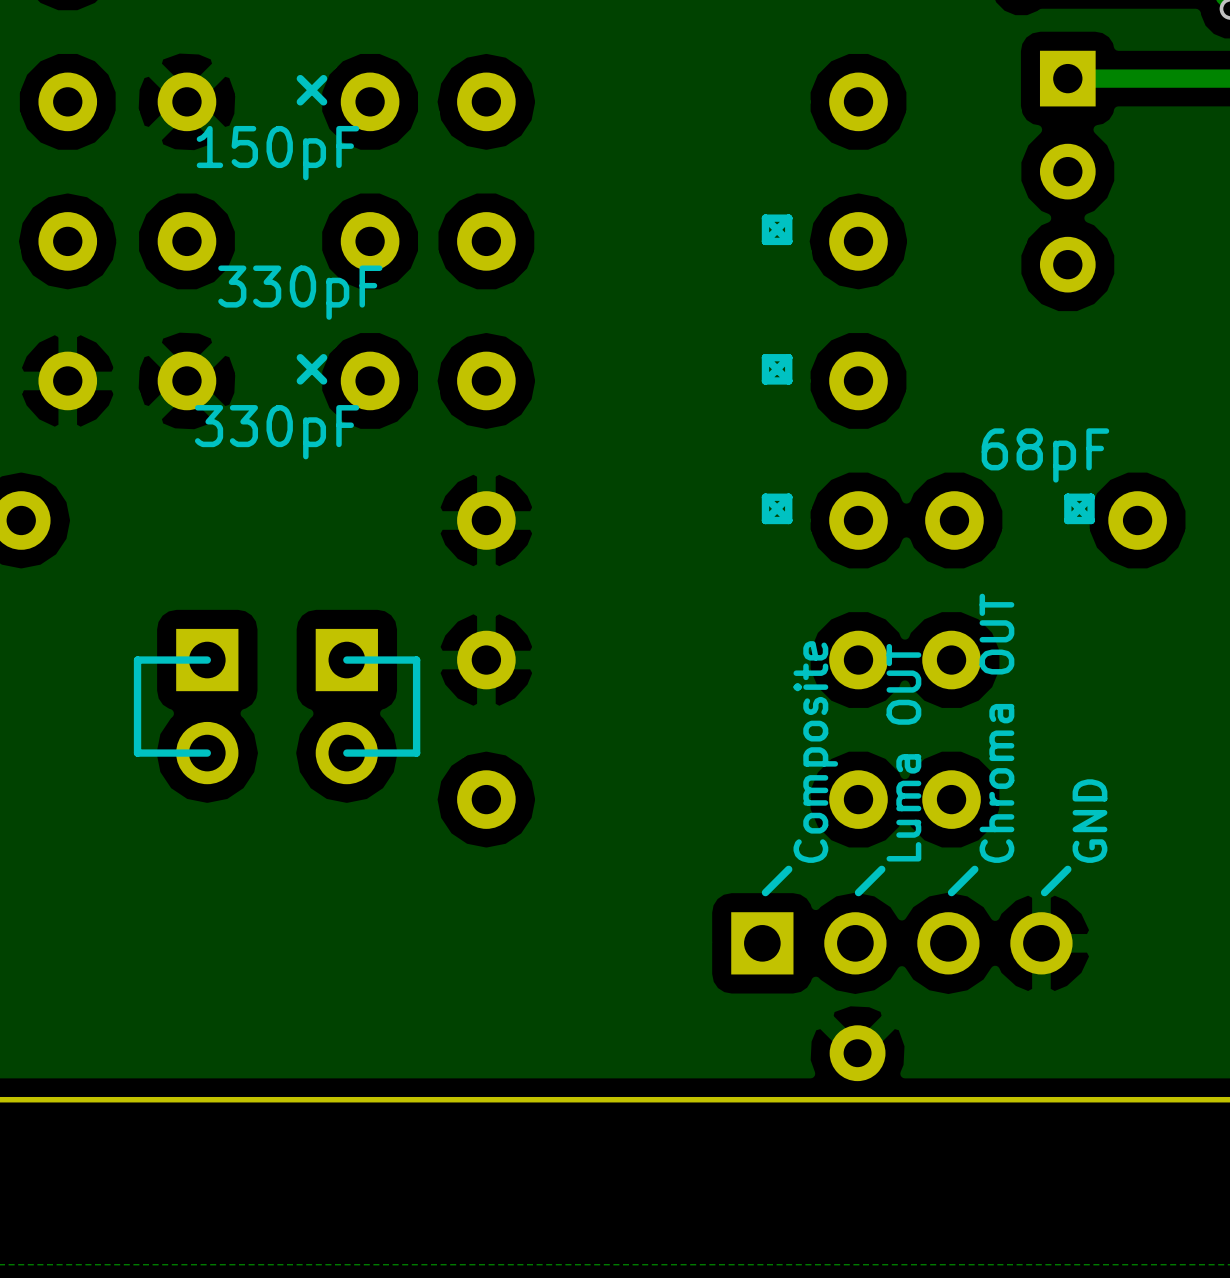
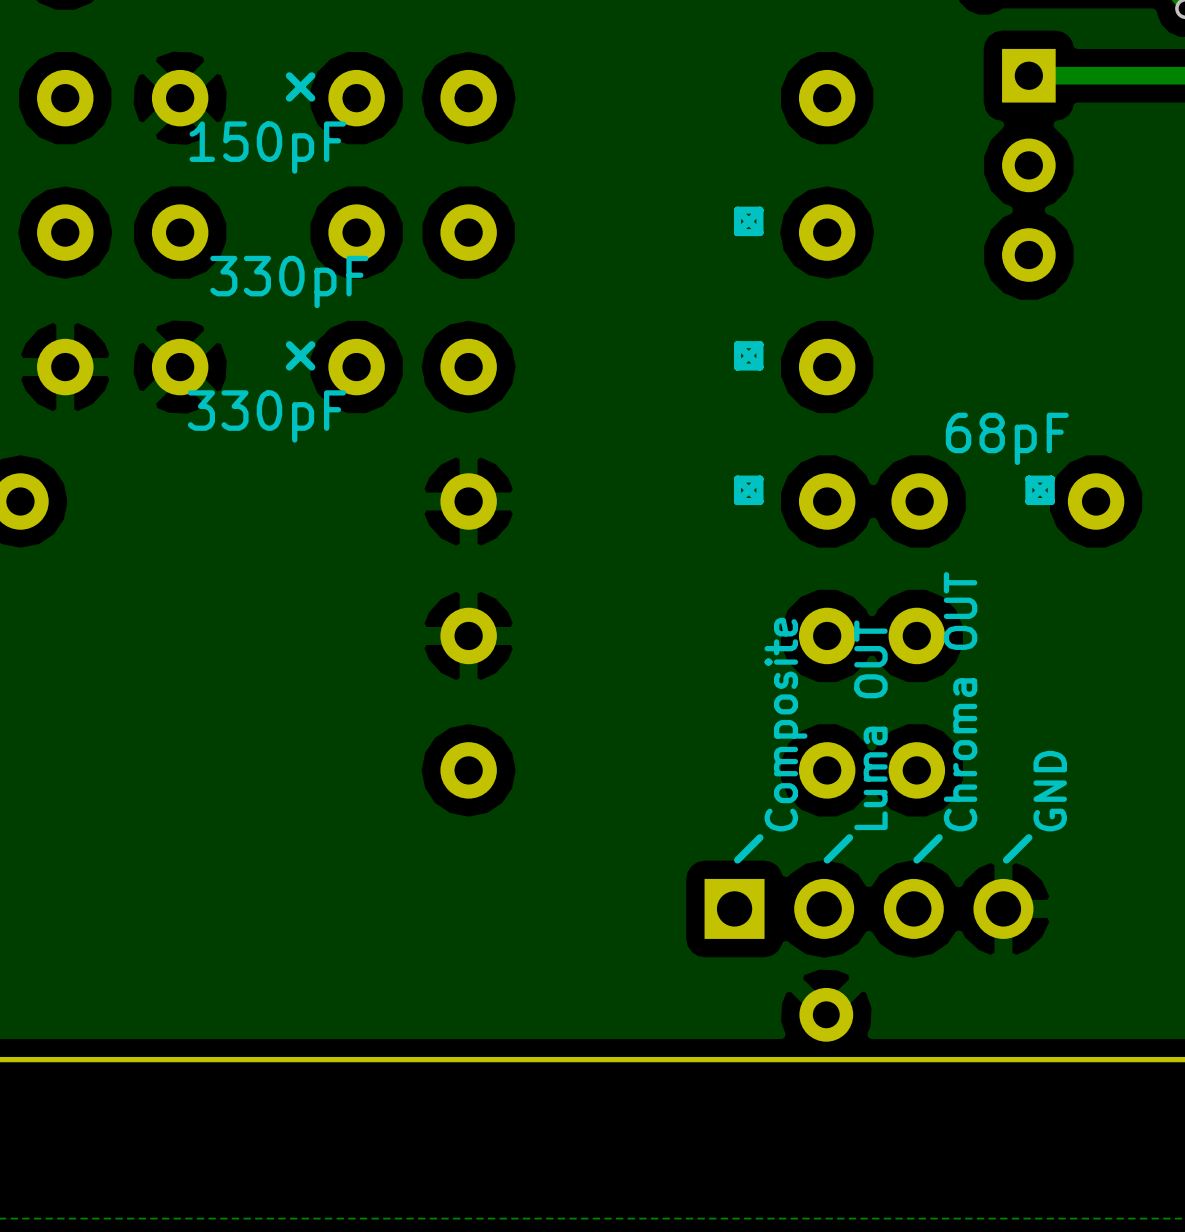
line: (207, 660) (137, 660) (137, 753) (207, 753) -> none
line: (346, 660) (416, 660) (416, 753) (346, 753) -> none
part: (207, 706) -> none
part: (346, 706) -> none

